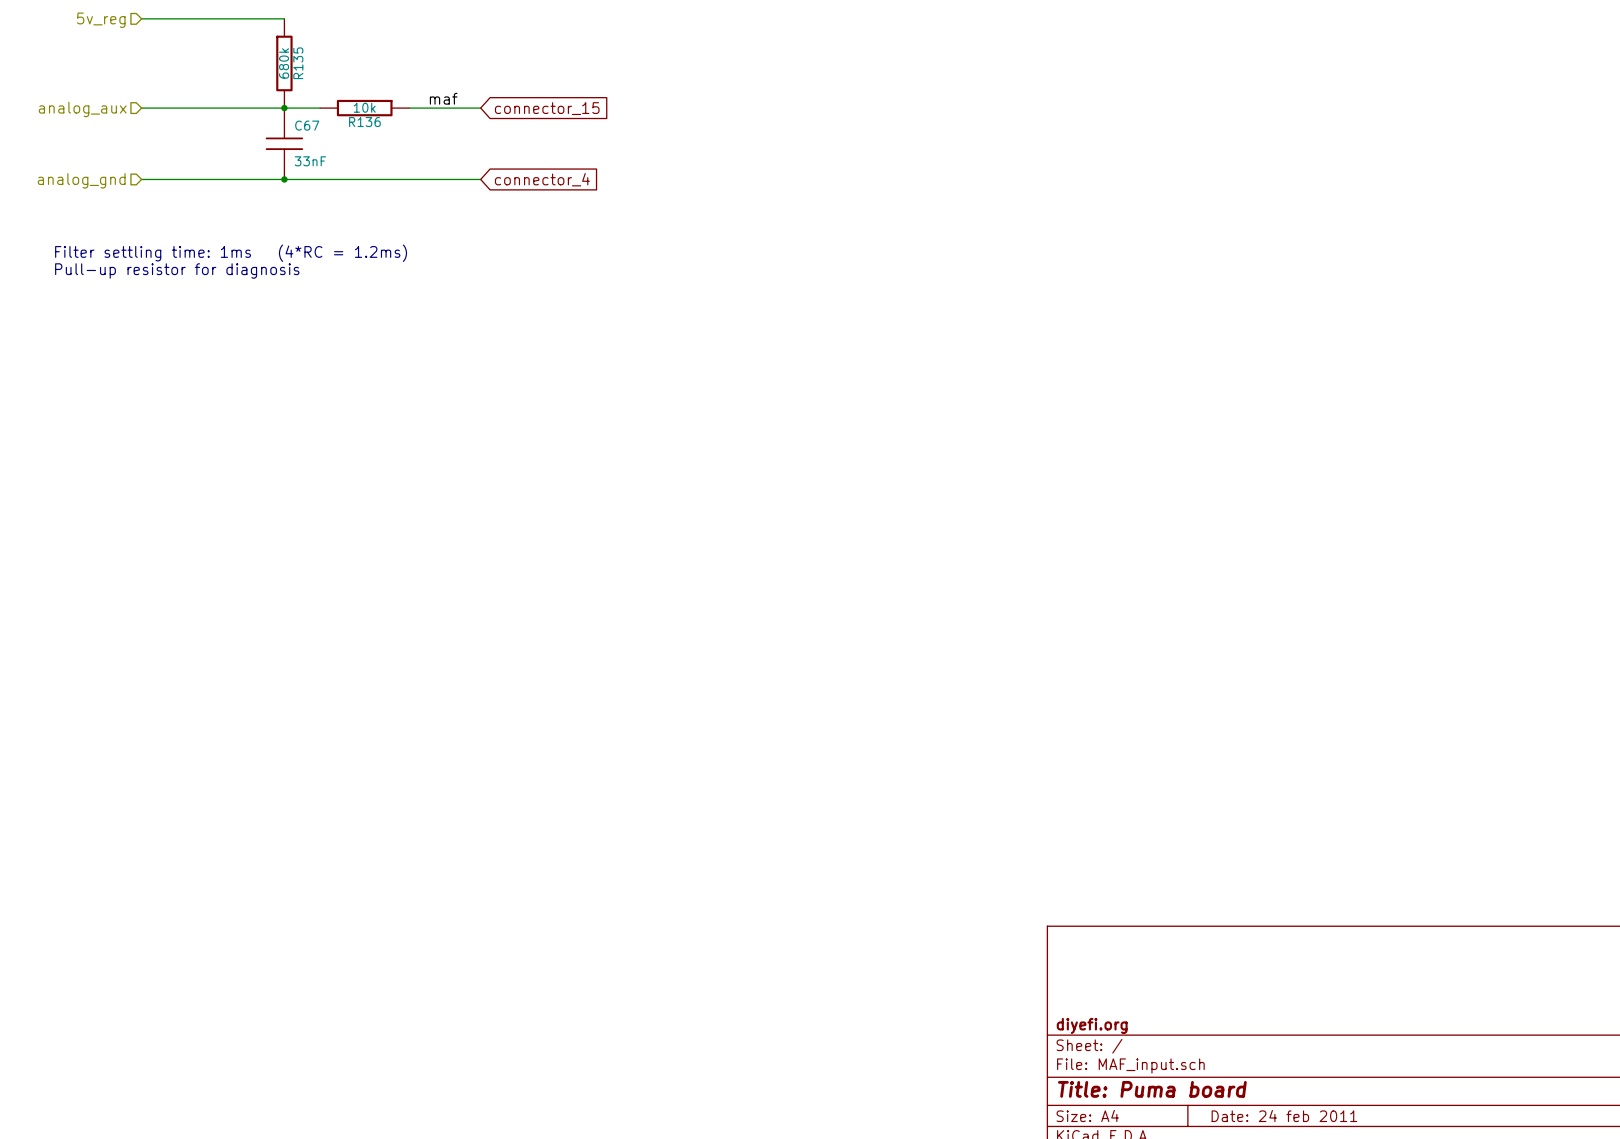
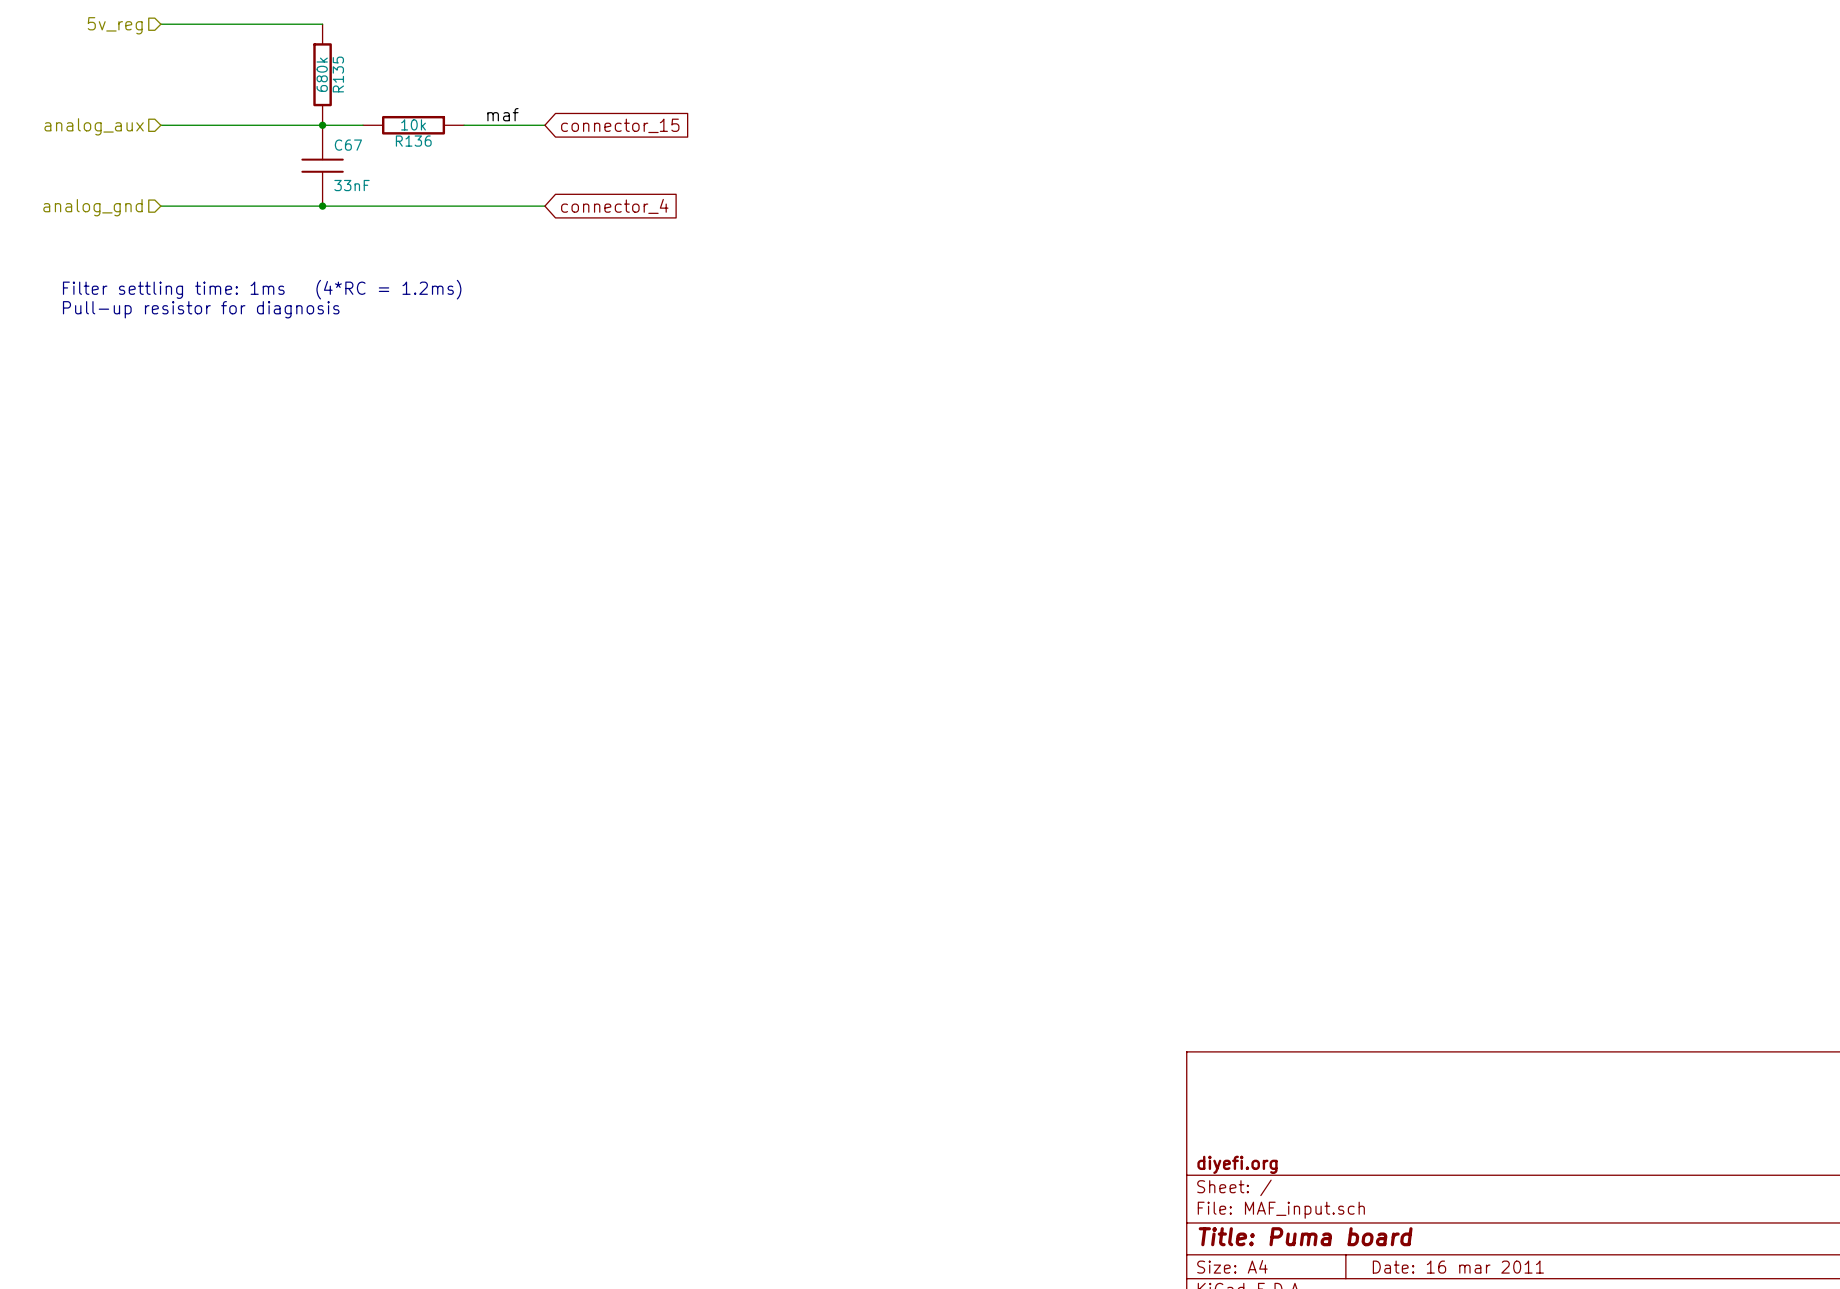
title block: Date: 24 feb 2011 (1284, 1115) -> Date: 16 mar 2011 (1458, 1267)

